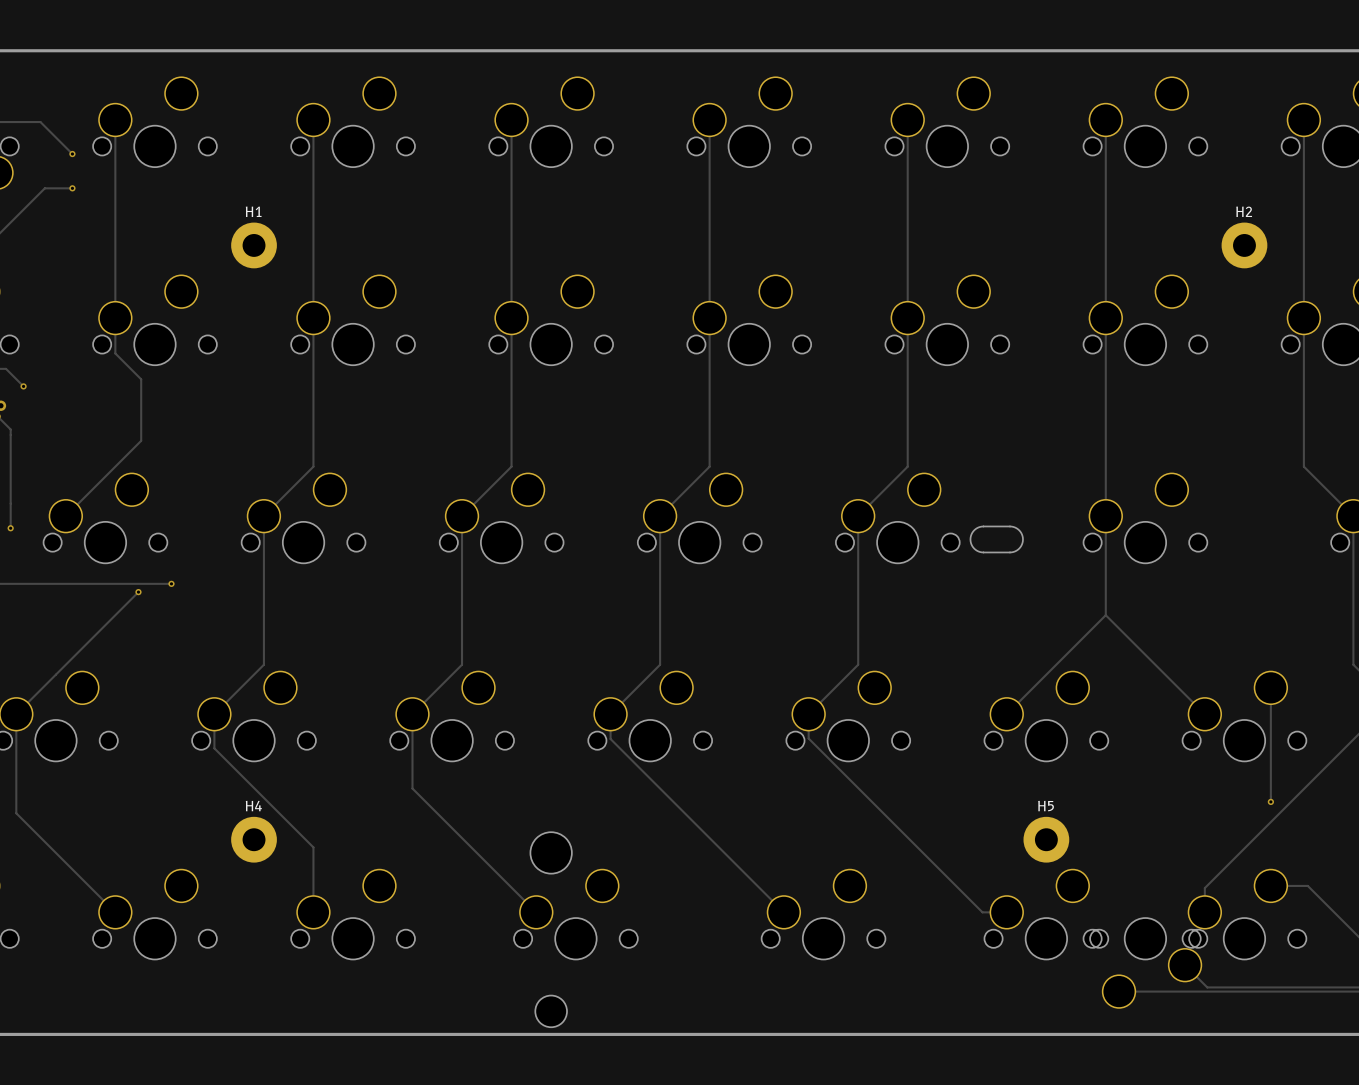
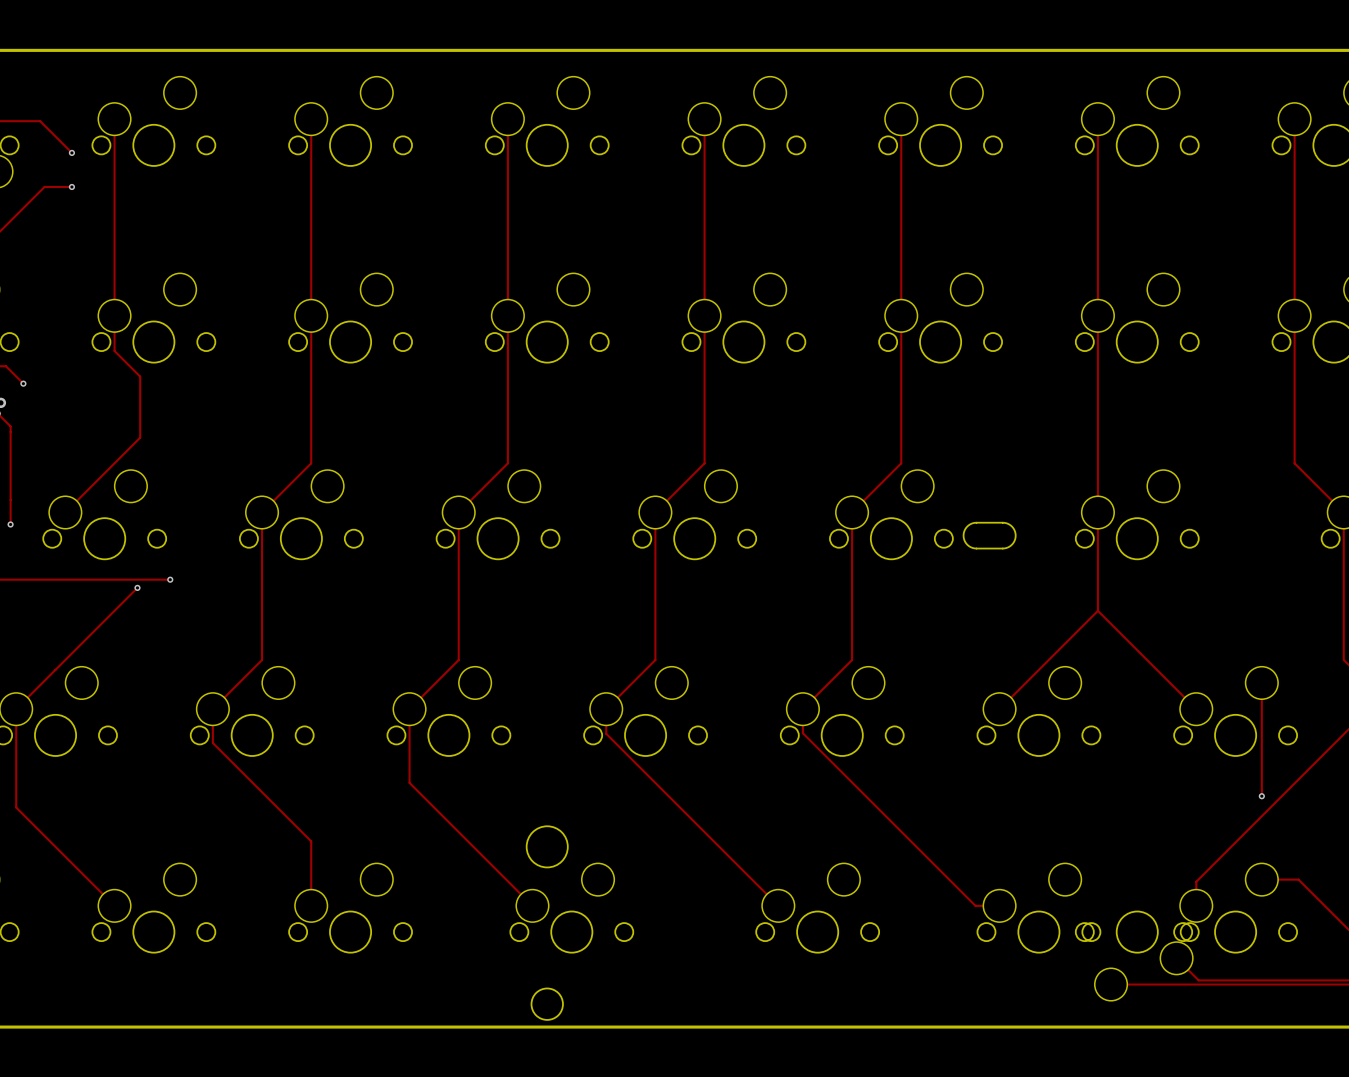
H1: (254, 245) -> none
H2: (1244, 245) -> none
H4: (254, 839) -> none
H5: (1046, 839) -> none

